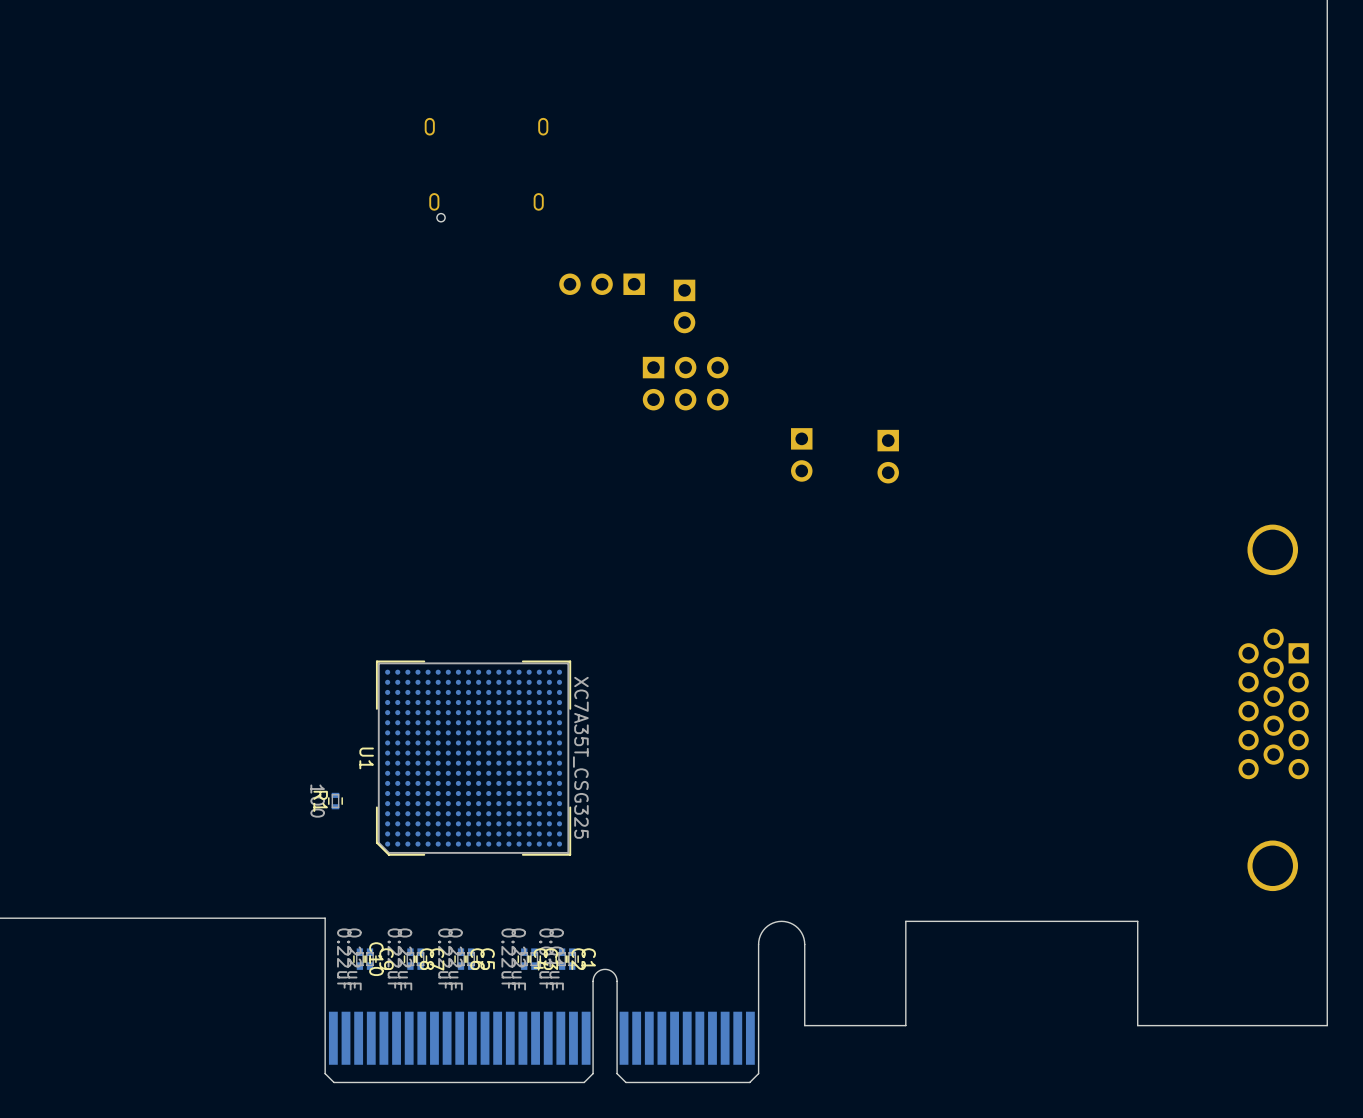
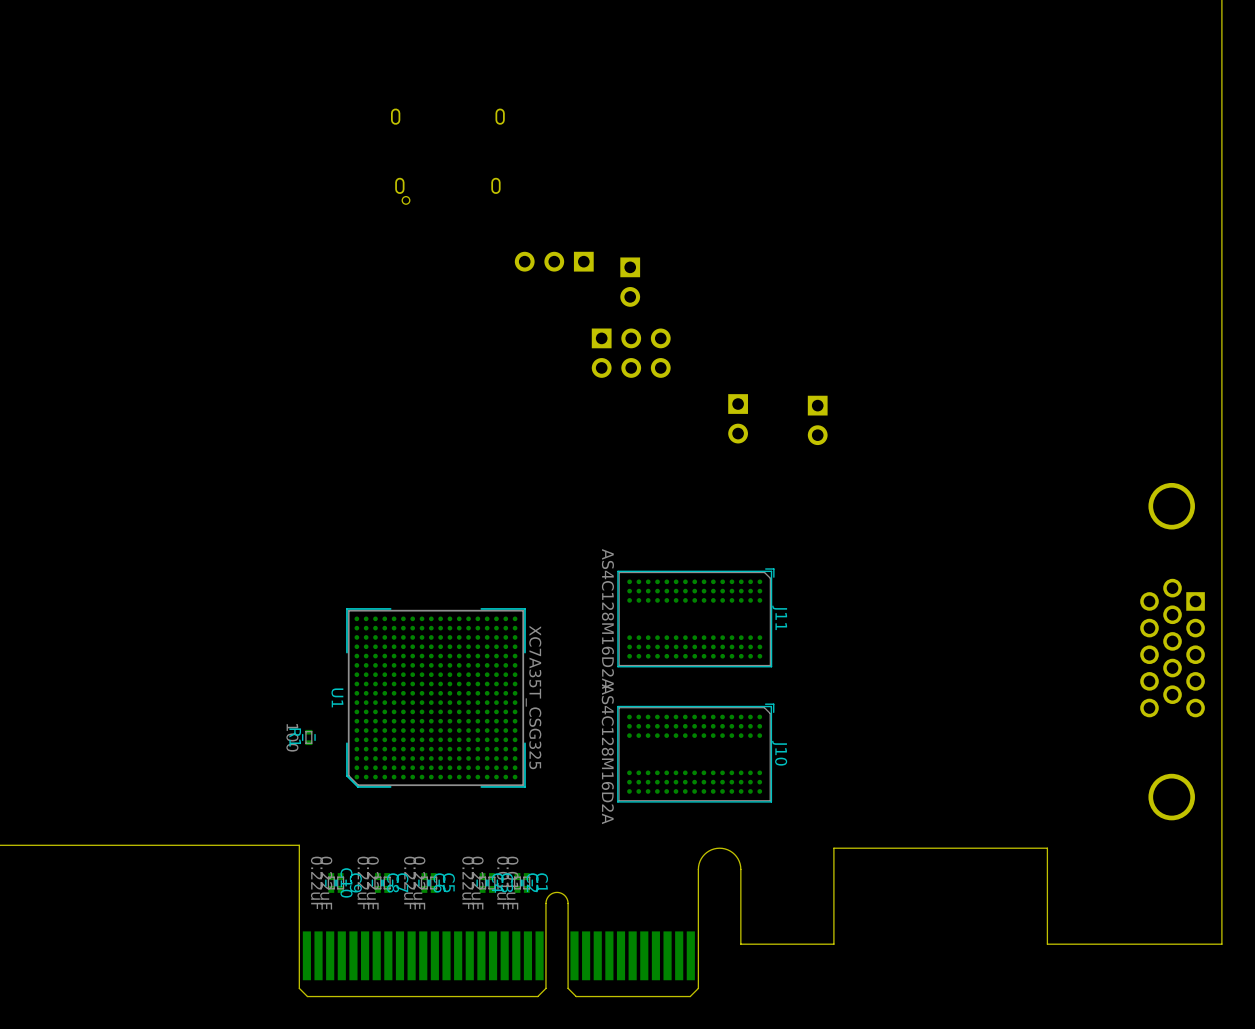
J11: none -> AS4C128M16D2A (695, 617)
J10: none -> AS4C128M16D2A (695, 753)

